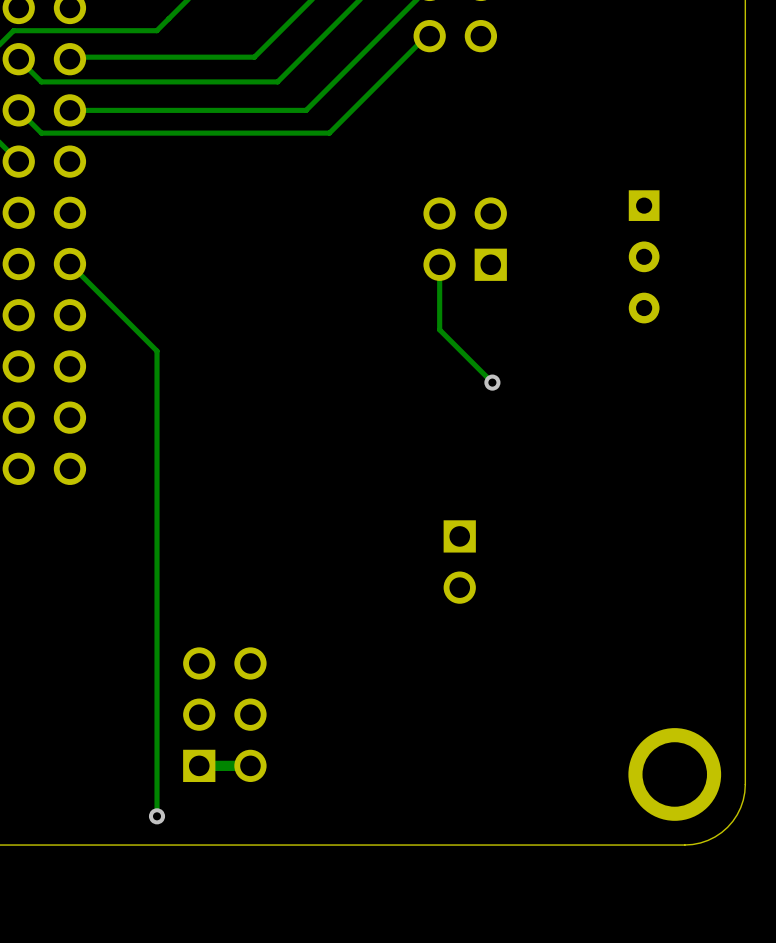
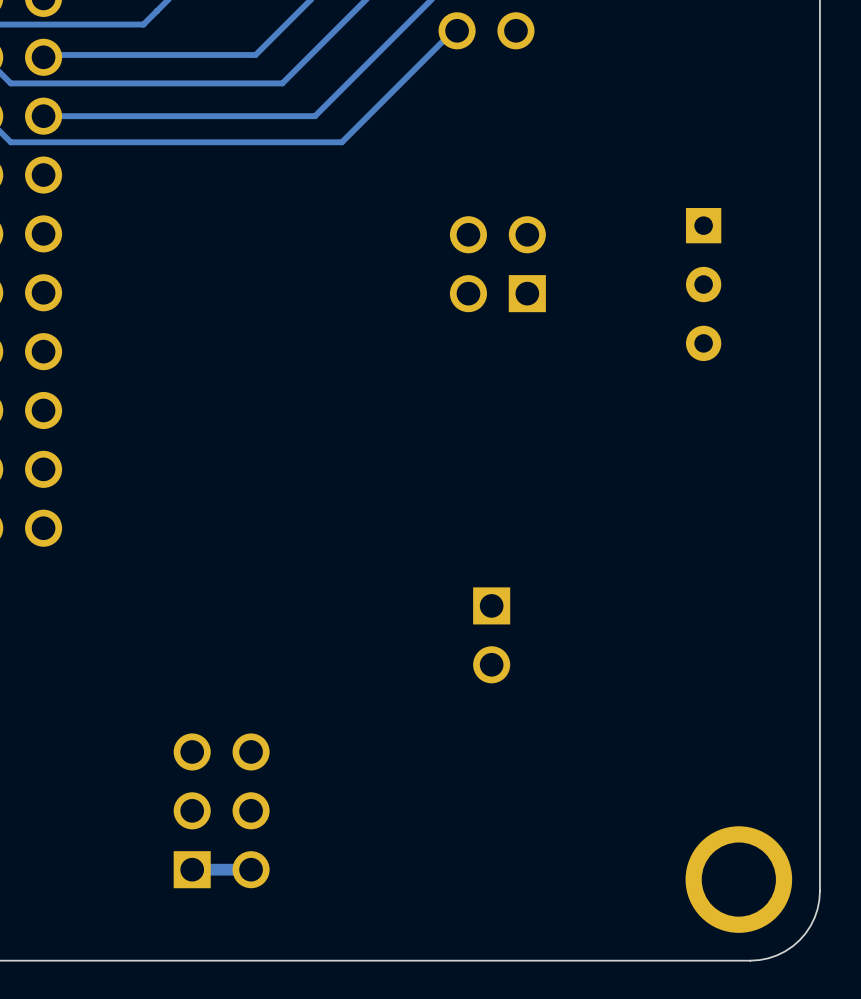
track: (69, 264) (157, 351) (157, 816) -> none
track: (439, 264) (439, 329) (492, 382) -> none
via: (492, 382) -> none
via: (157, 816) -> none

